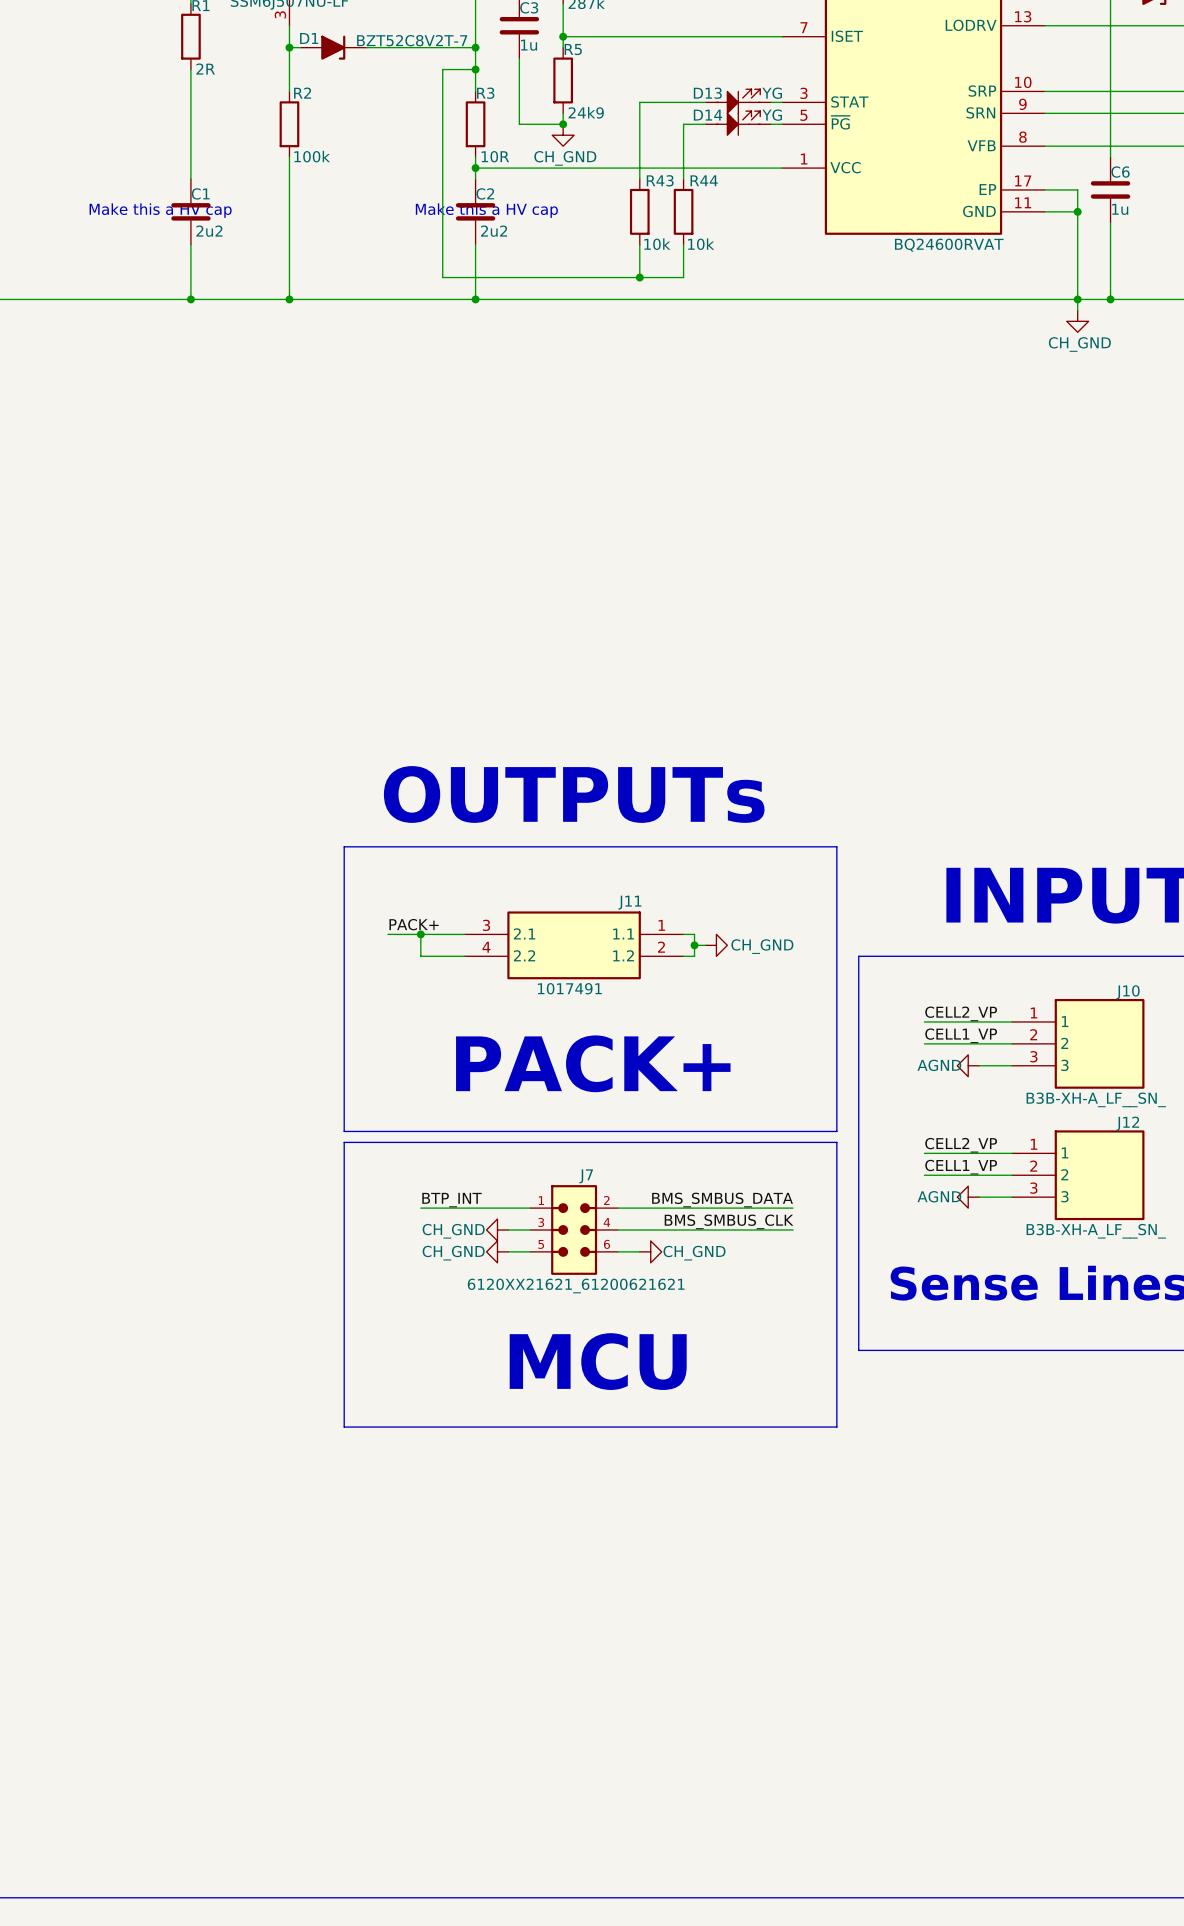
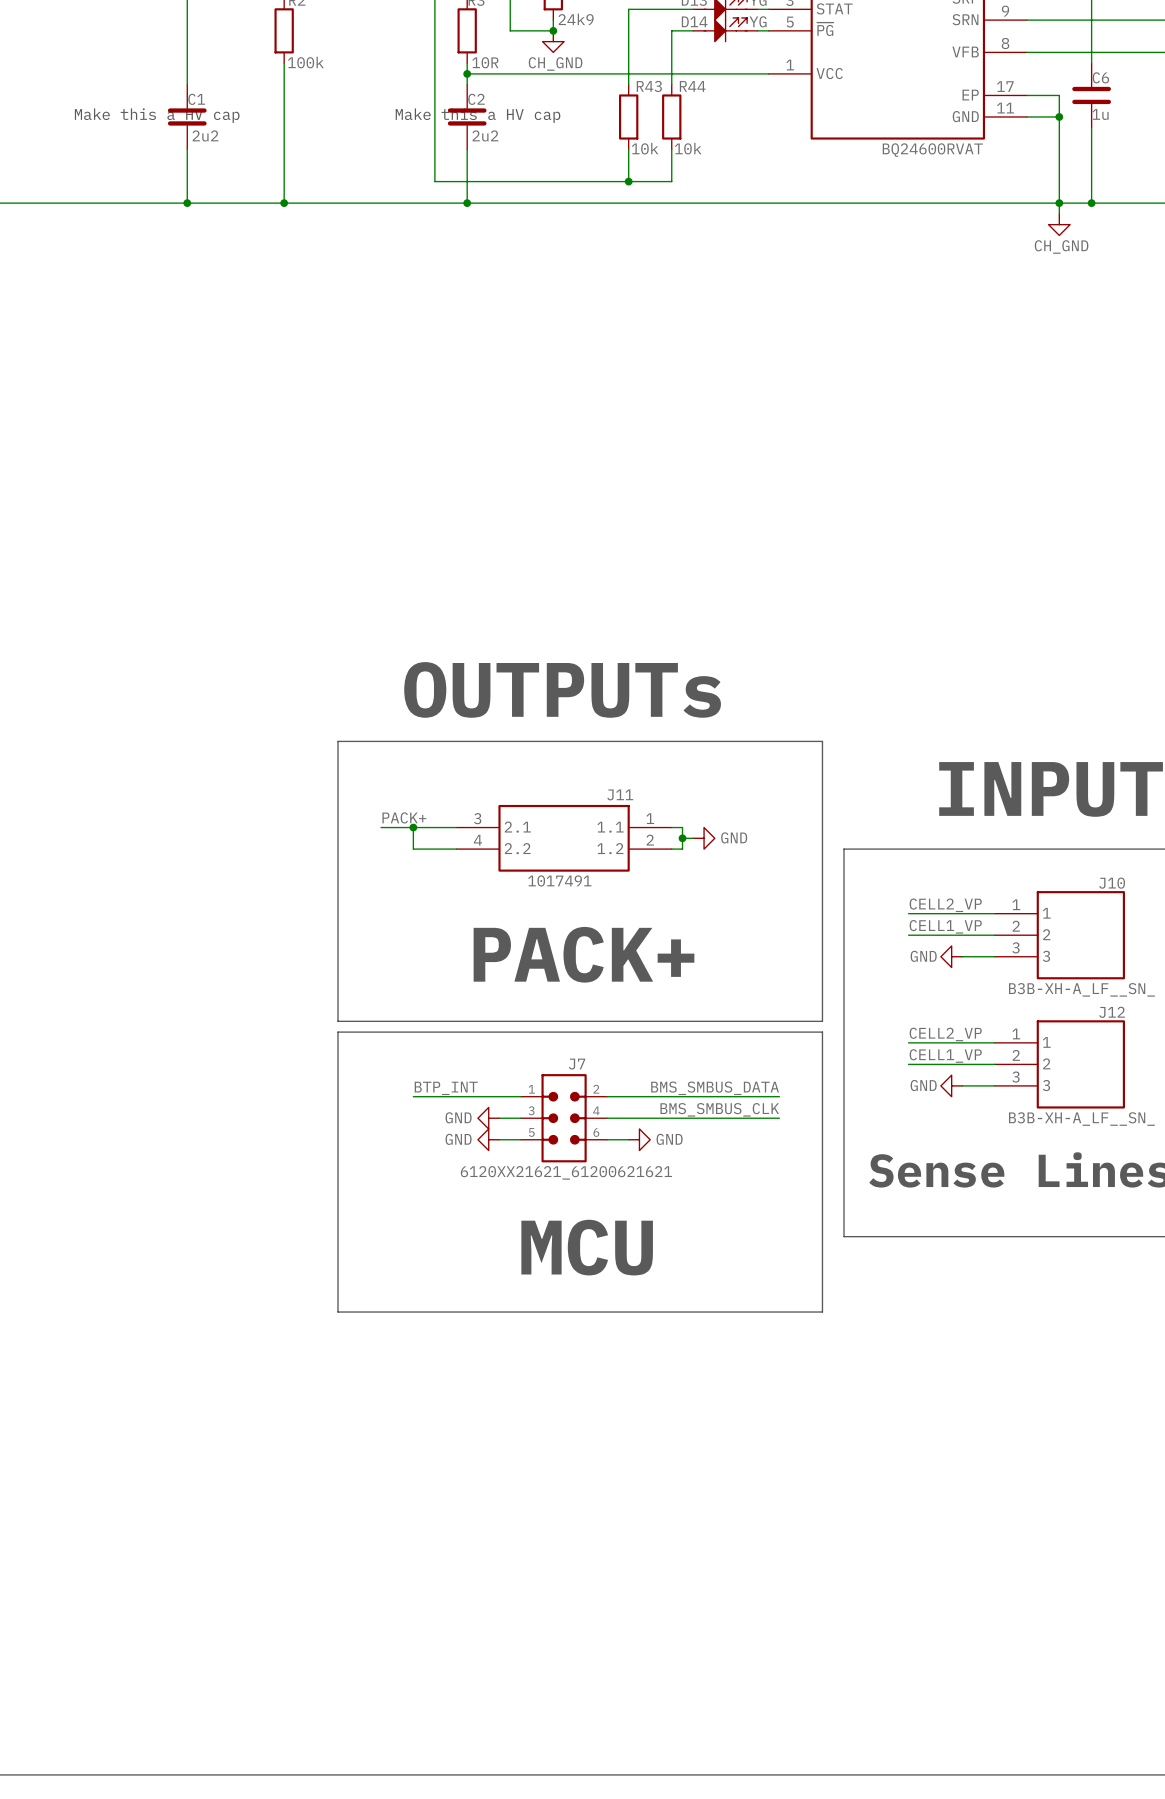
power symbol: CH_GND (716, 945) -> GND (704, 838)
power symbol: AGND (968, 1065) -> GND (951, 956)
power symbol: AGND (968, 1197) -> GND (951, 1085)
power symbol: CH_GND (497, 1229) -> GND (488, 1118)
power symbol: CH_GND (497, 1251) -> GND (488, 1139)
power symbol: CH_GND (650, 1251) -> GND (639, 1139)

